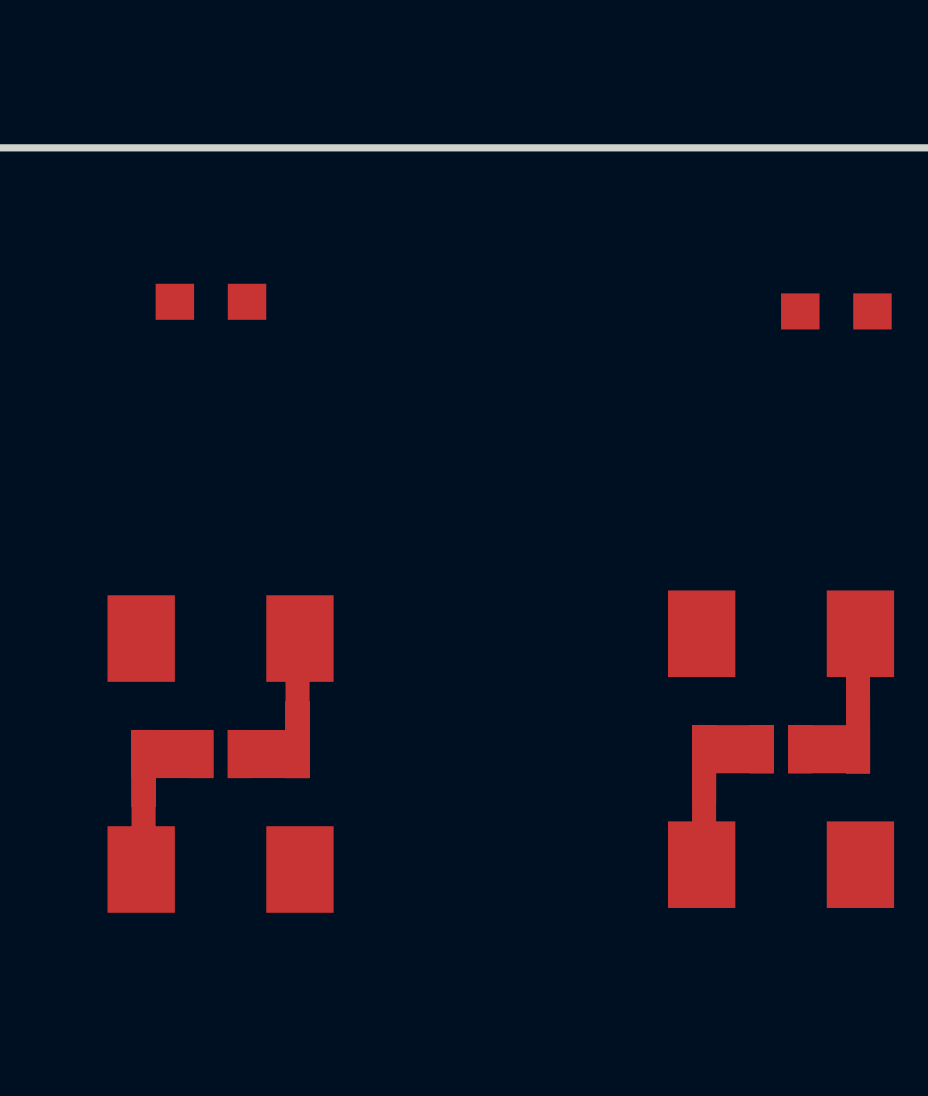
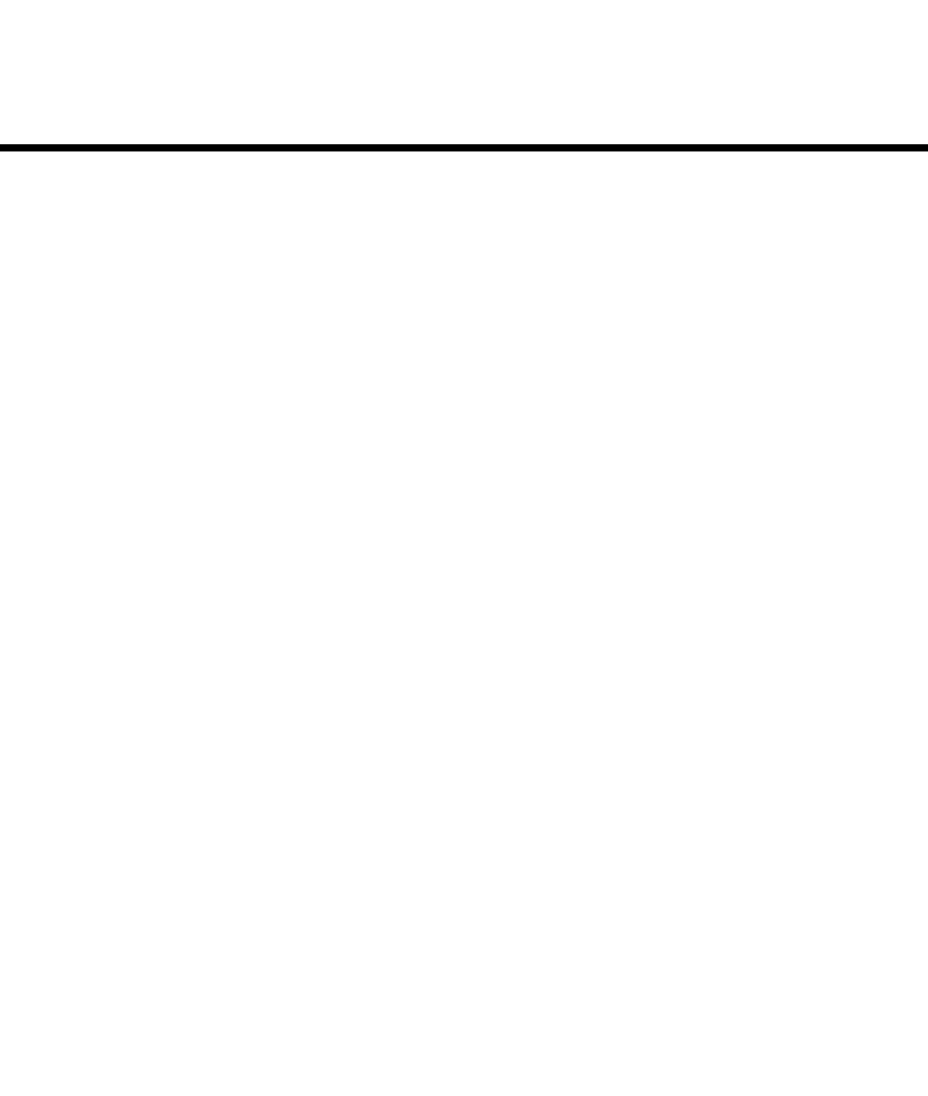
part: (210, 301) -> none
part: (836, 311) -> none
part: (781, 749) -> none
part: (220, 754) -> none

